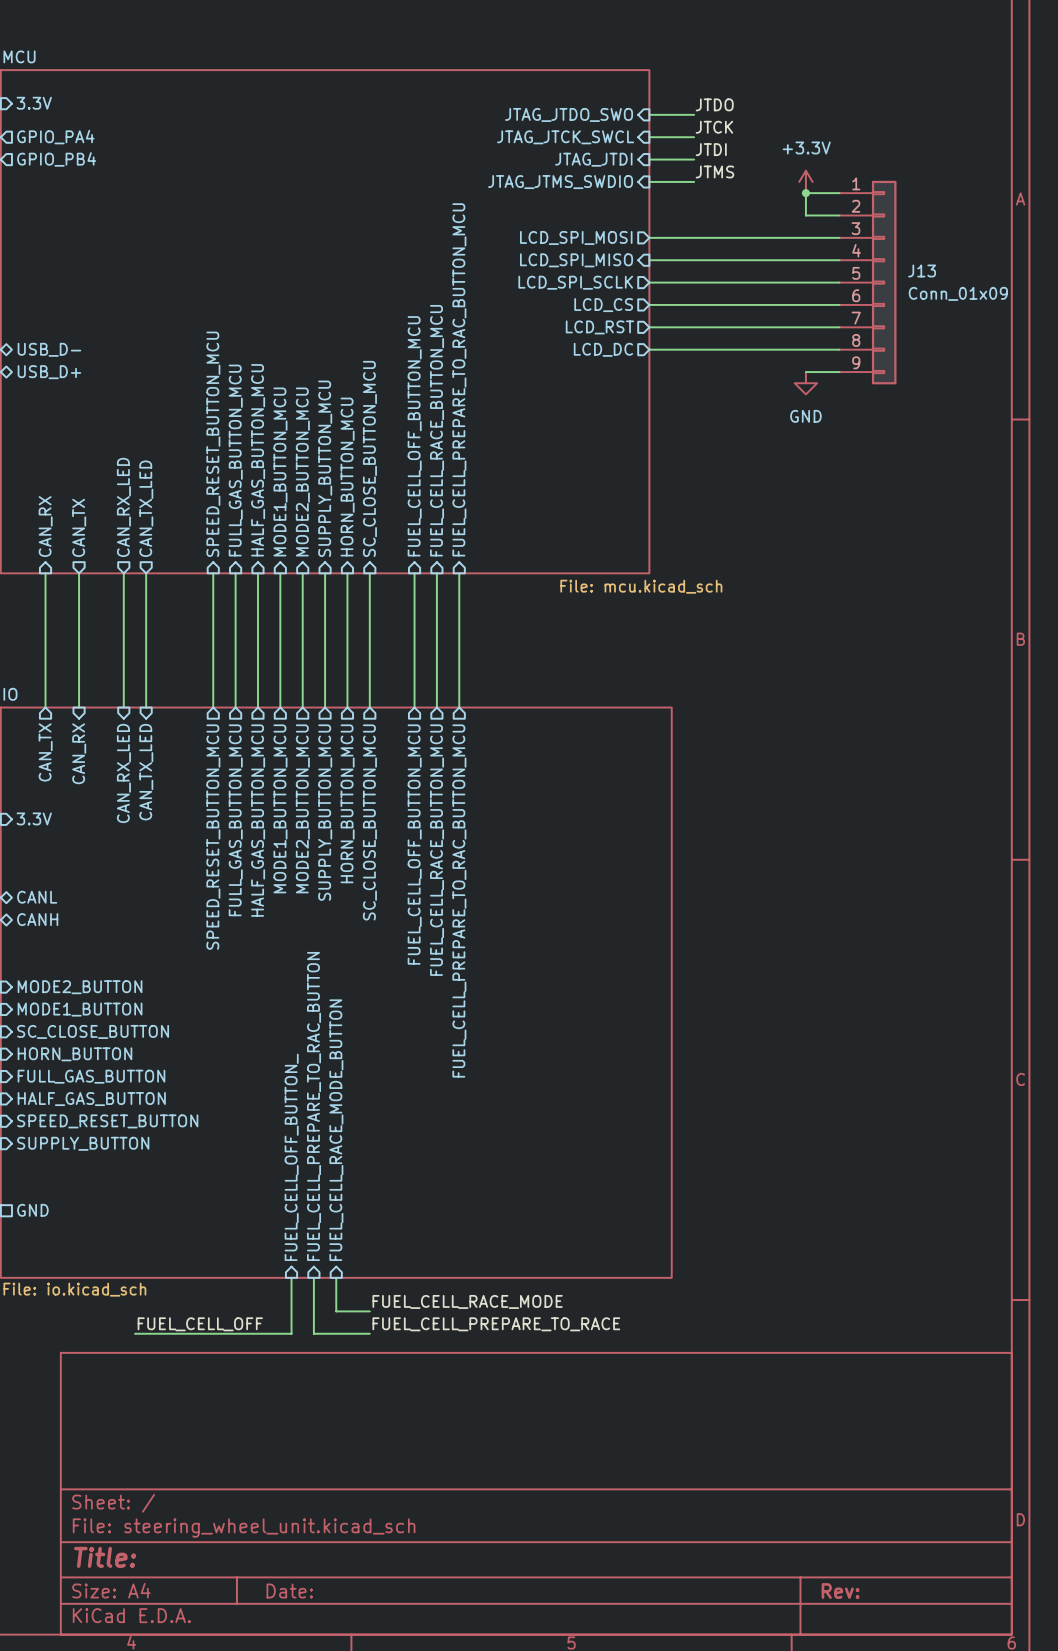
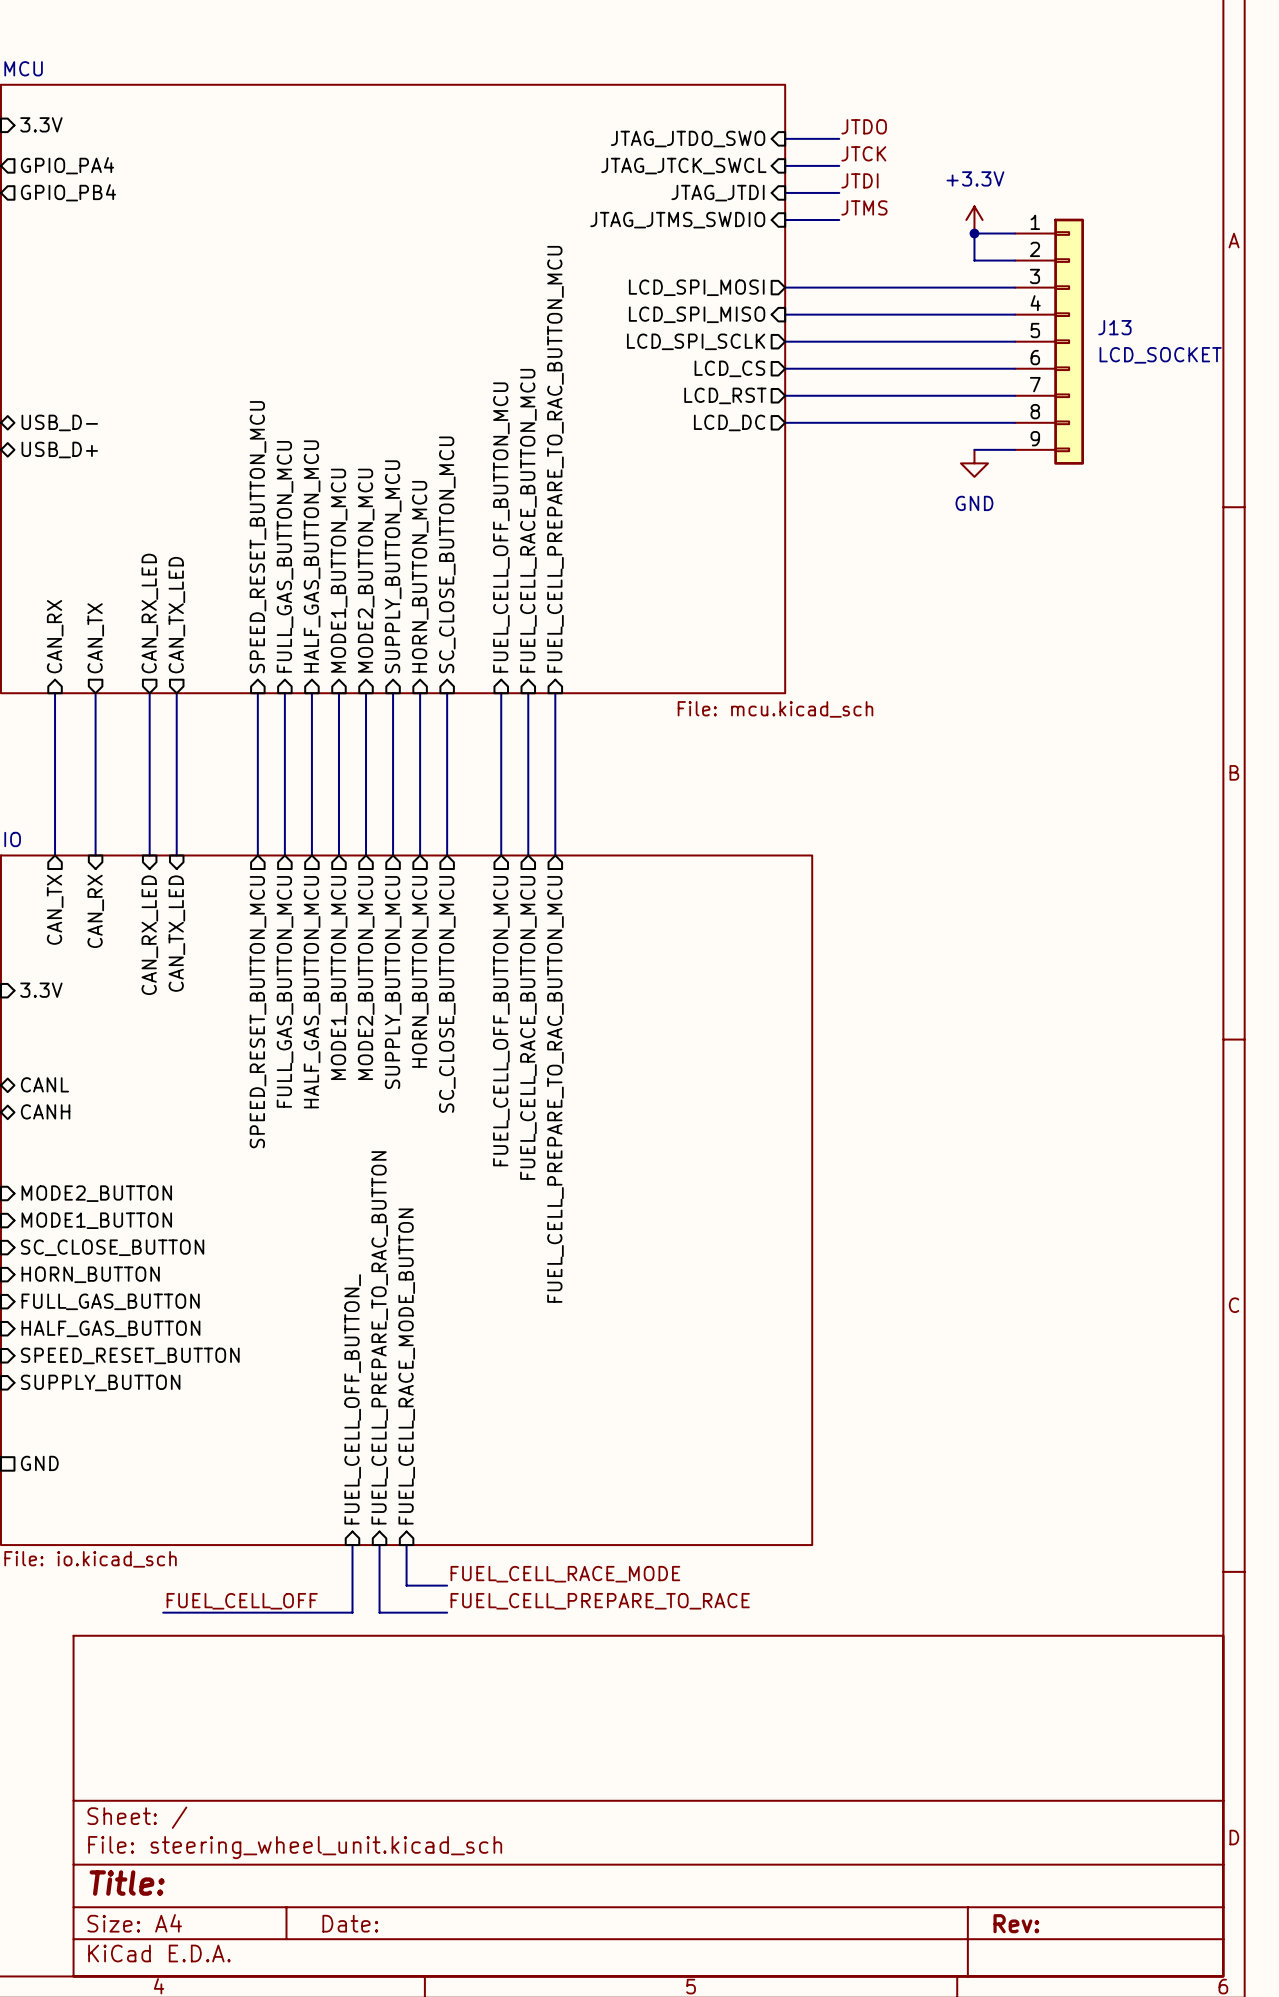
J13 value: Conn_01x09 (958, 293) -> LCD_SOCKET (1160, 355)

